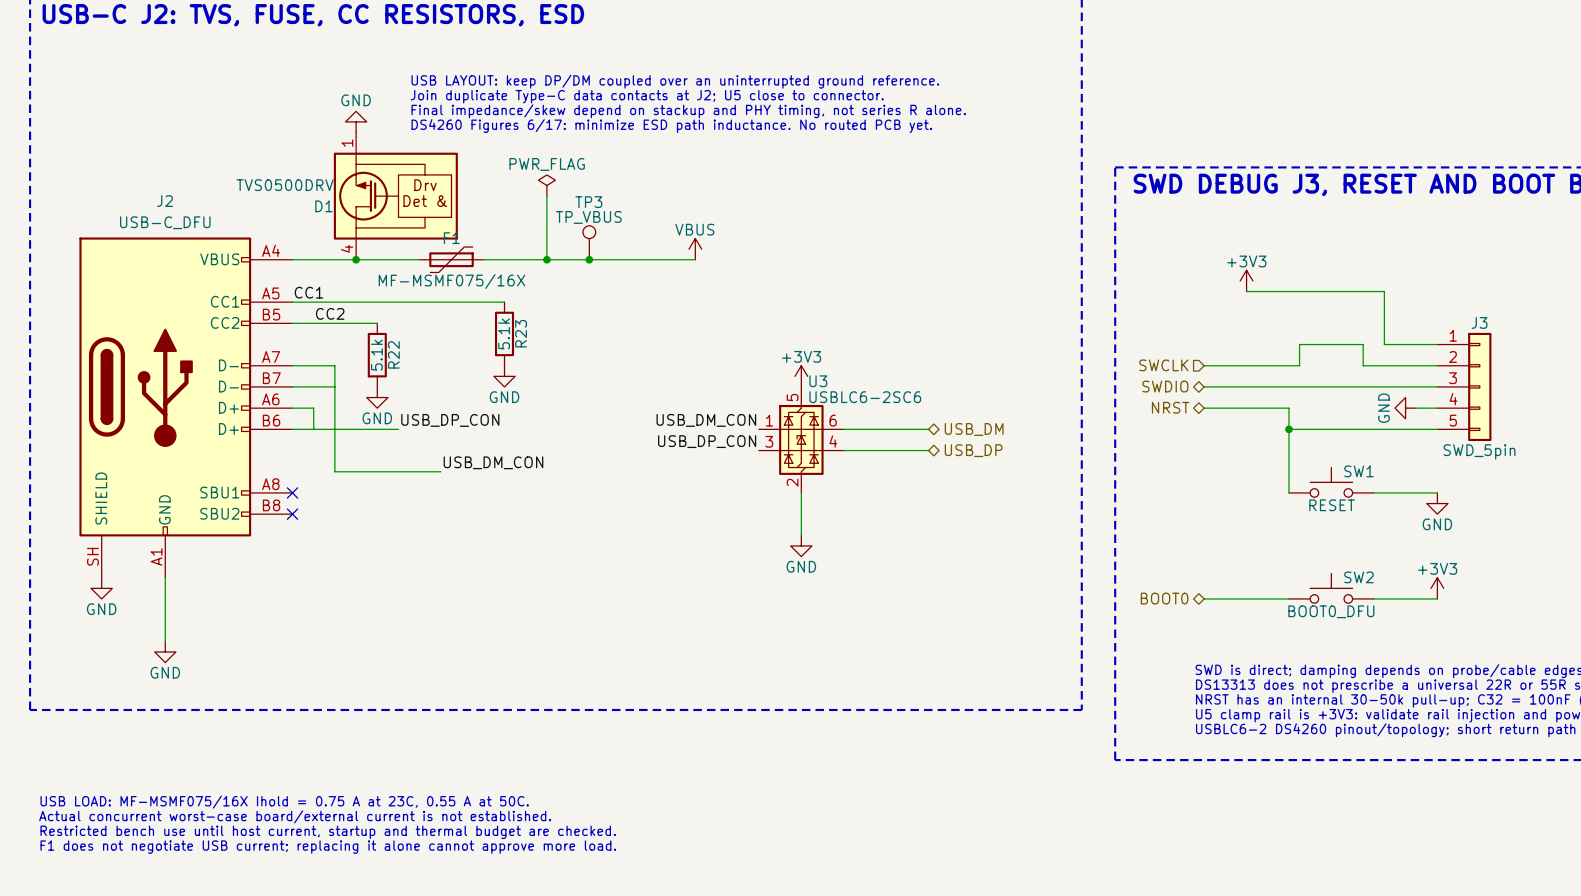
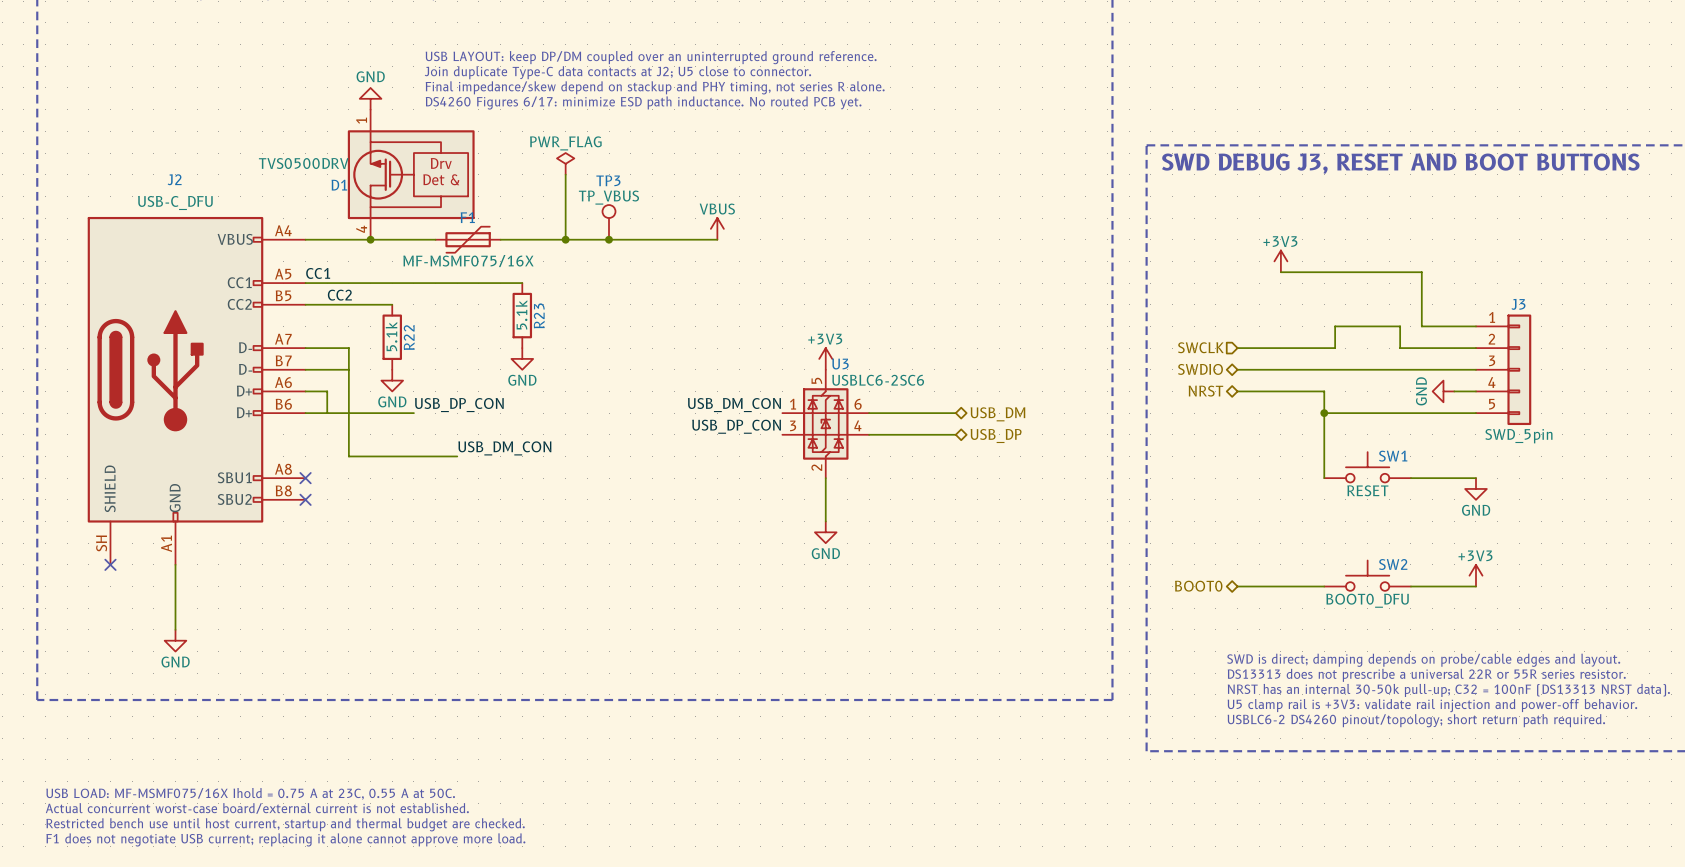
no-connect mark: none -> (110, 564)
power symbol: GND (101, 588) -> none

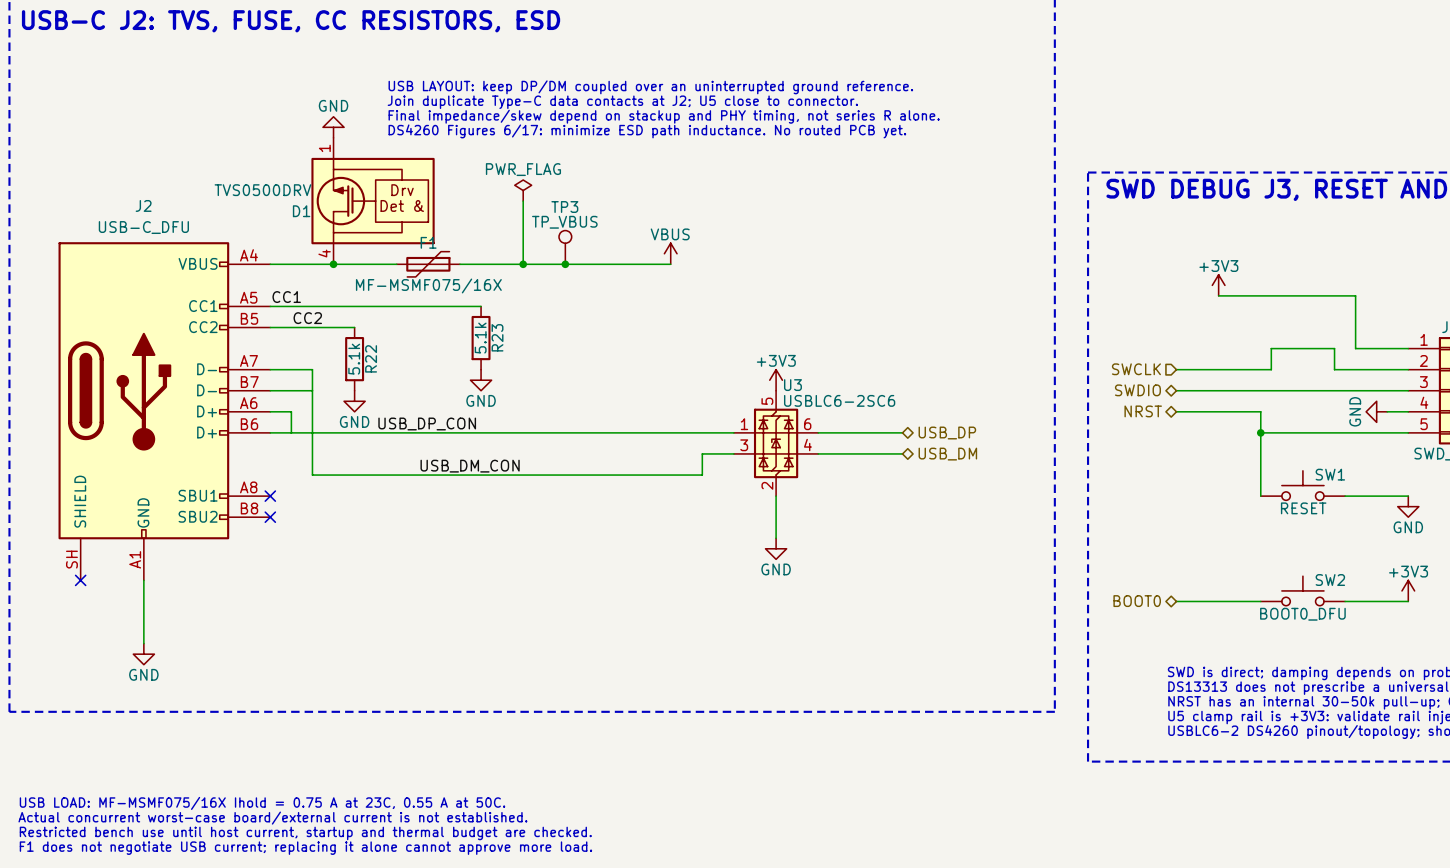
label: USB_DM_CON (734, 405) -> none
wire: none -> (375, 432) (733, 432)
hierarchical label: USB_DM (997, 414) -> USB_DP (947, 433)
label: USB_DP_CON (736, 426) -> none
wire: none -> (733, 453) (702, 453) (702, 475) (417, 475)
hierarchical label: USB_DP (996, 436) -> USB_DM (947, 454)

